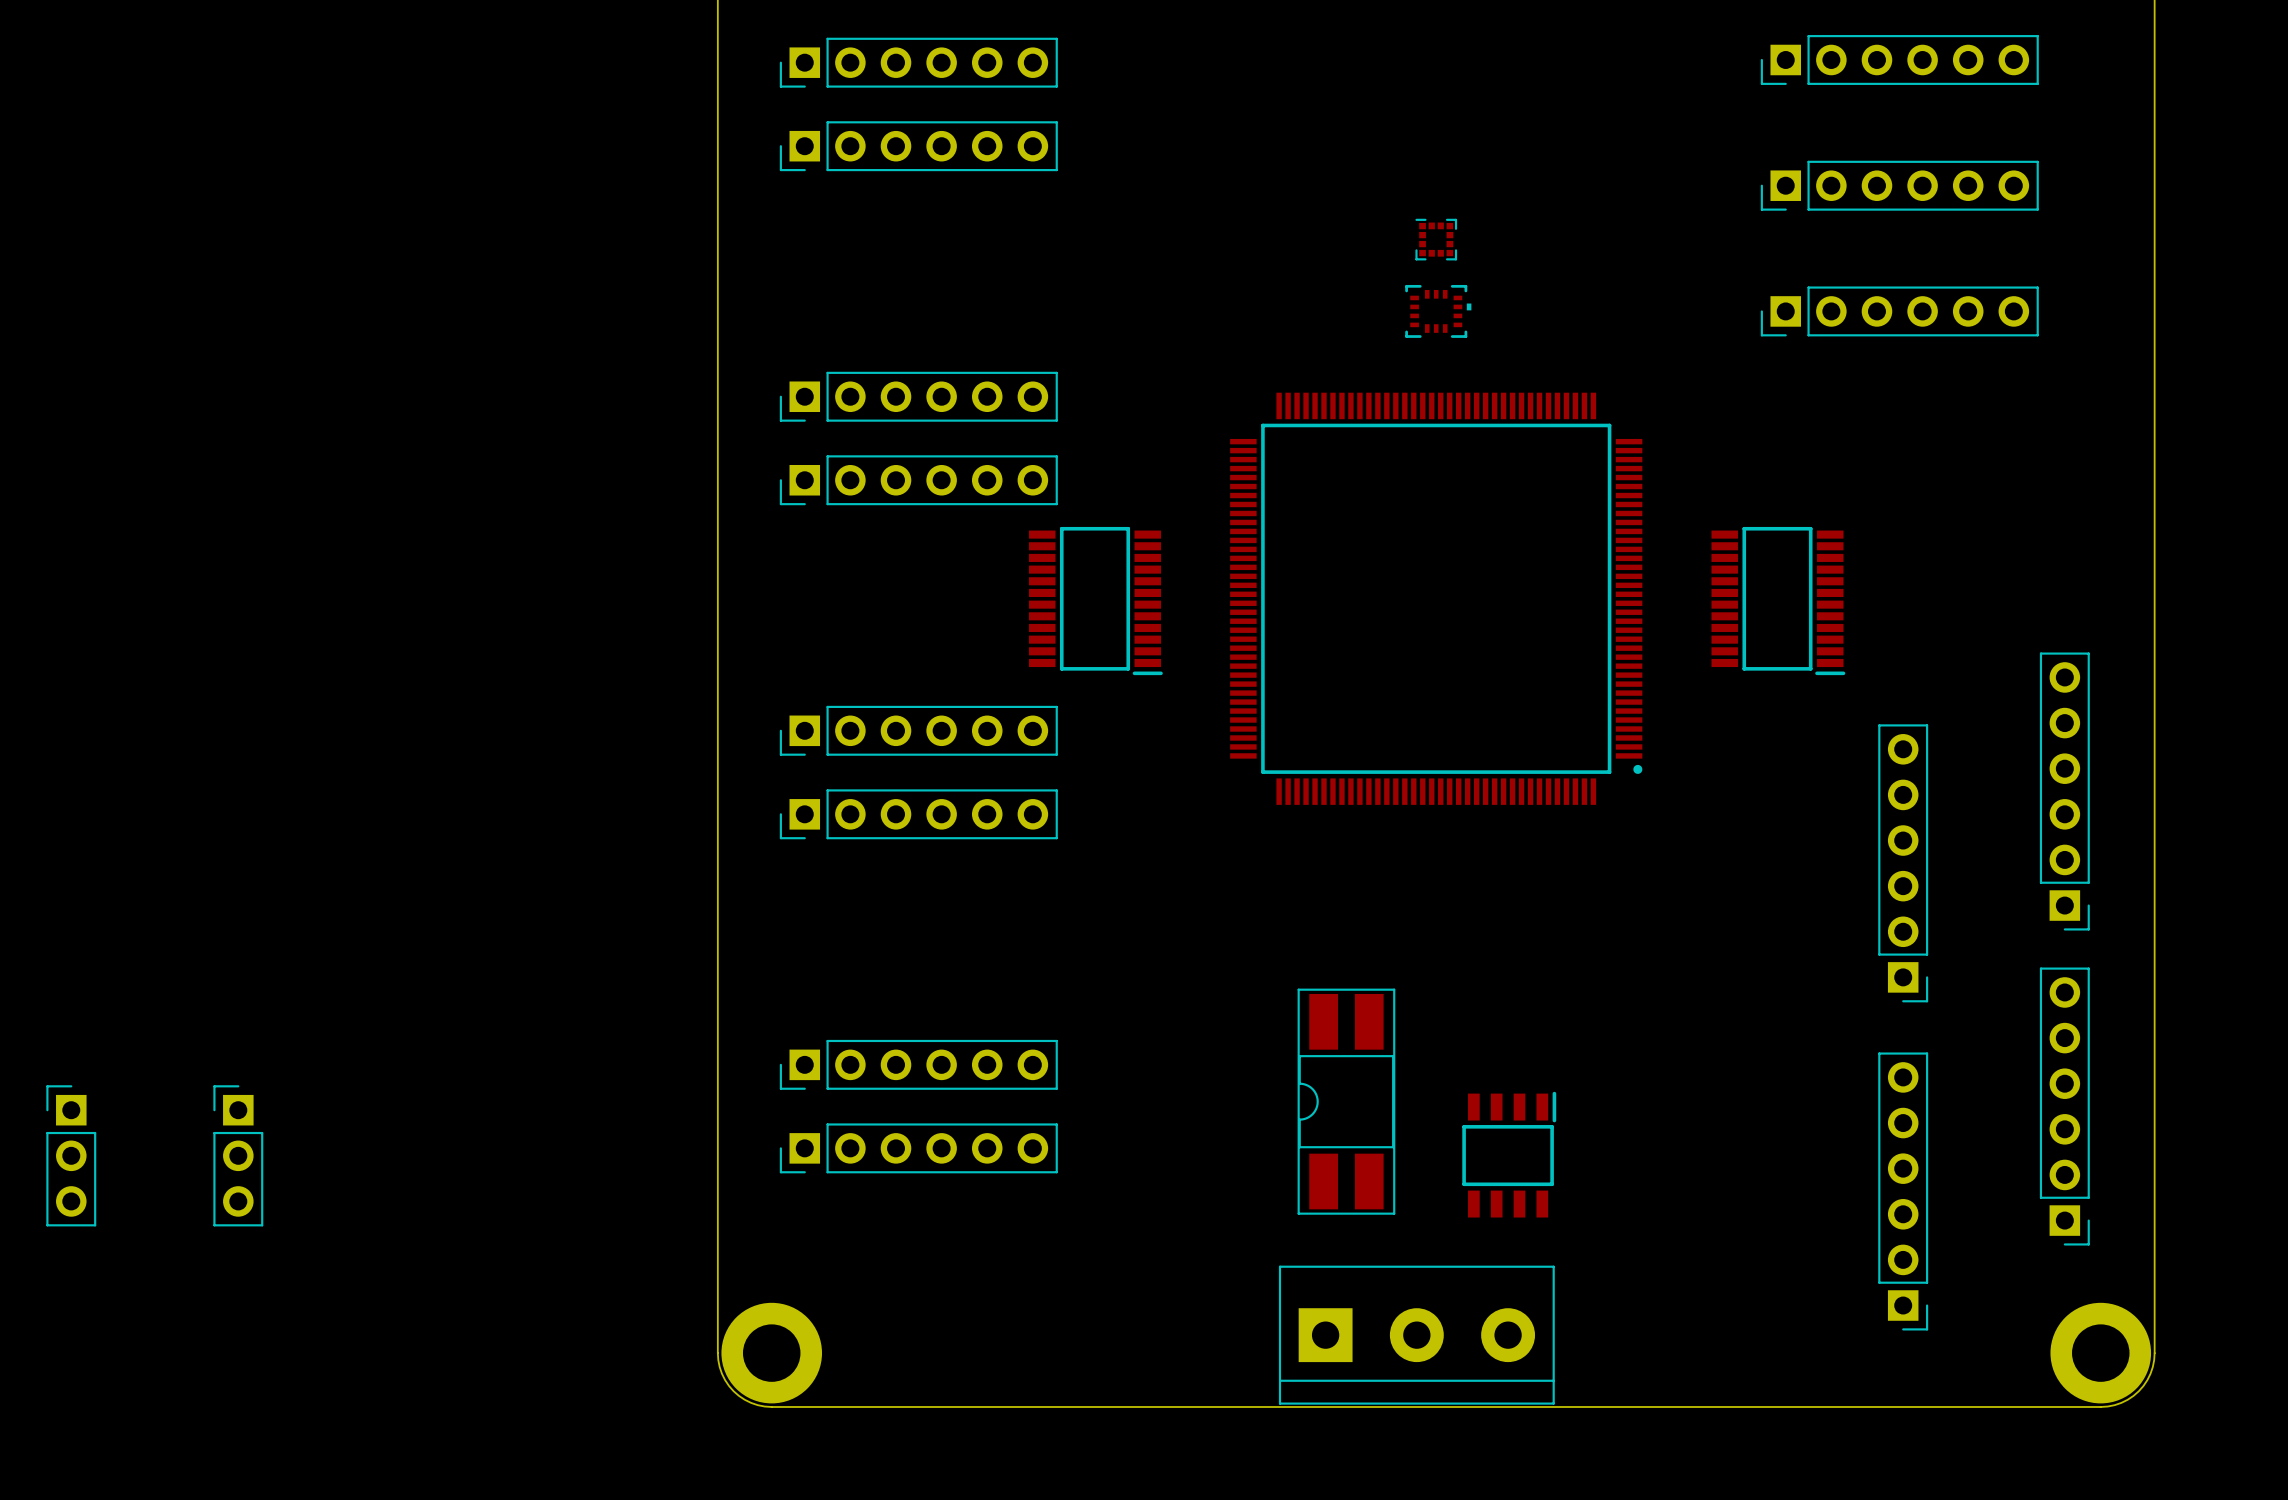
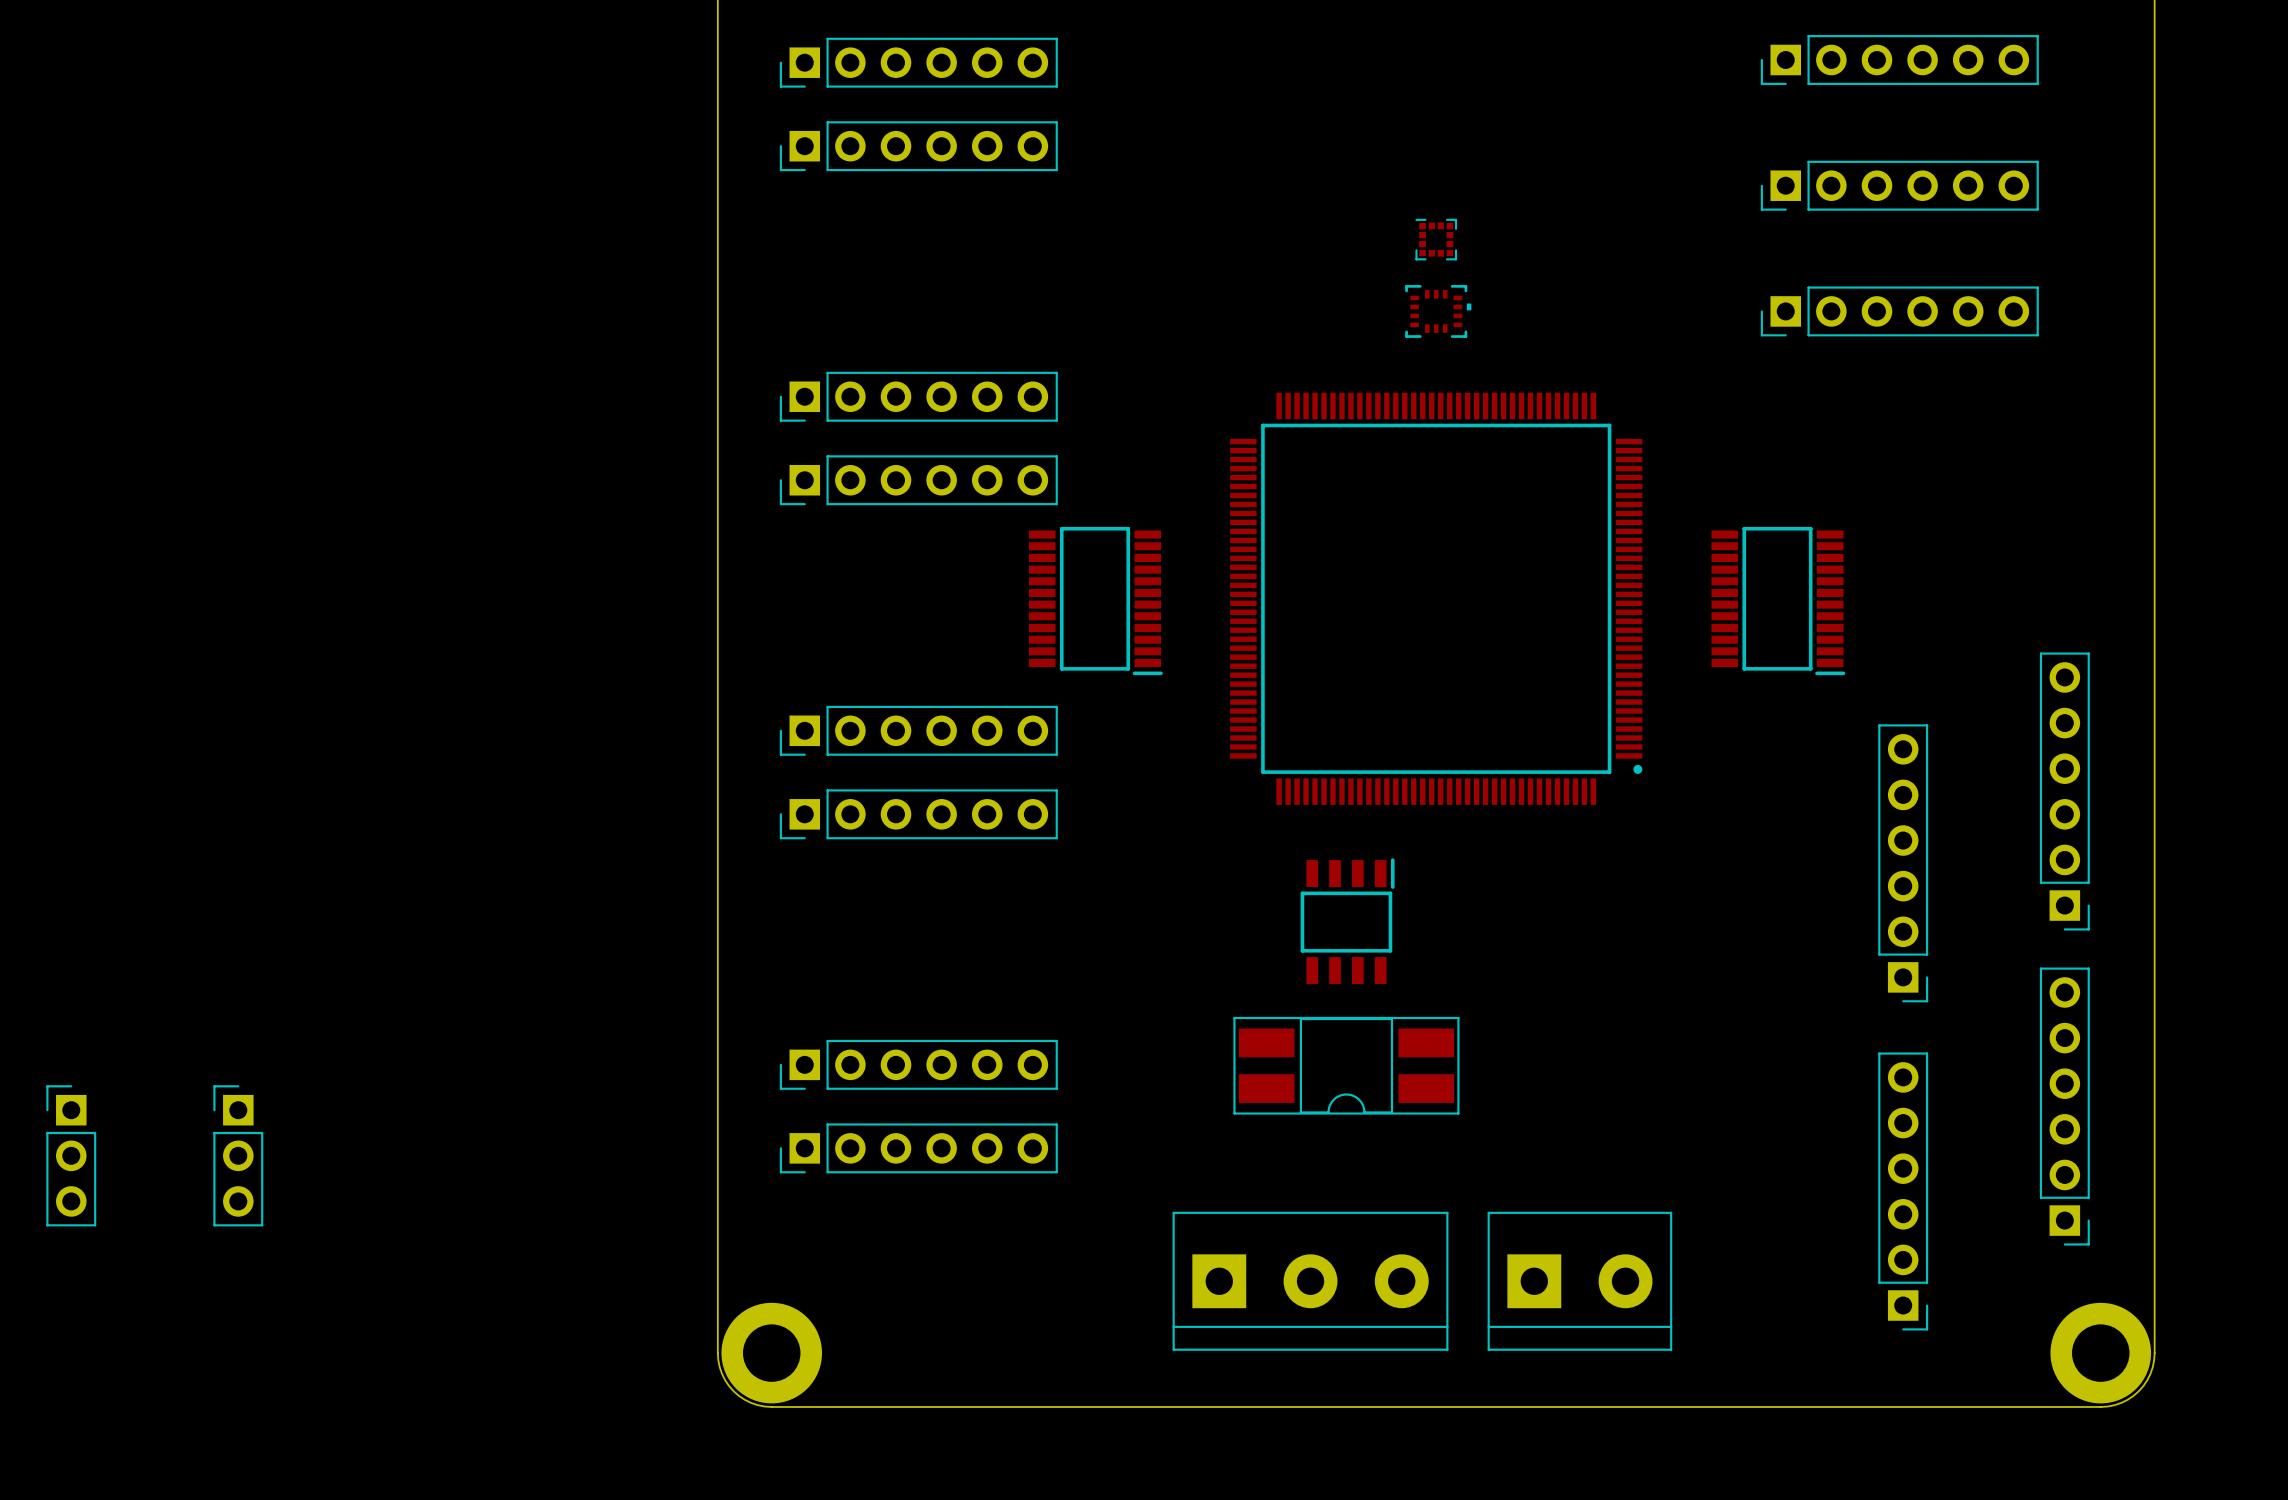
part rotation: 0° (1346, 1101) -> 90° counterclockwise (1346, 1065)
part position: (1509, 1154) -> (1347, 921)
part: none -> (1579, 1281)
part position: (1416, 1335) -> (1310, 1281)

